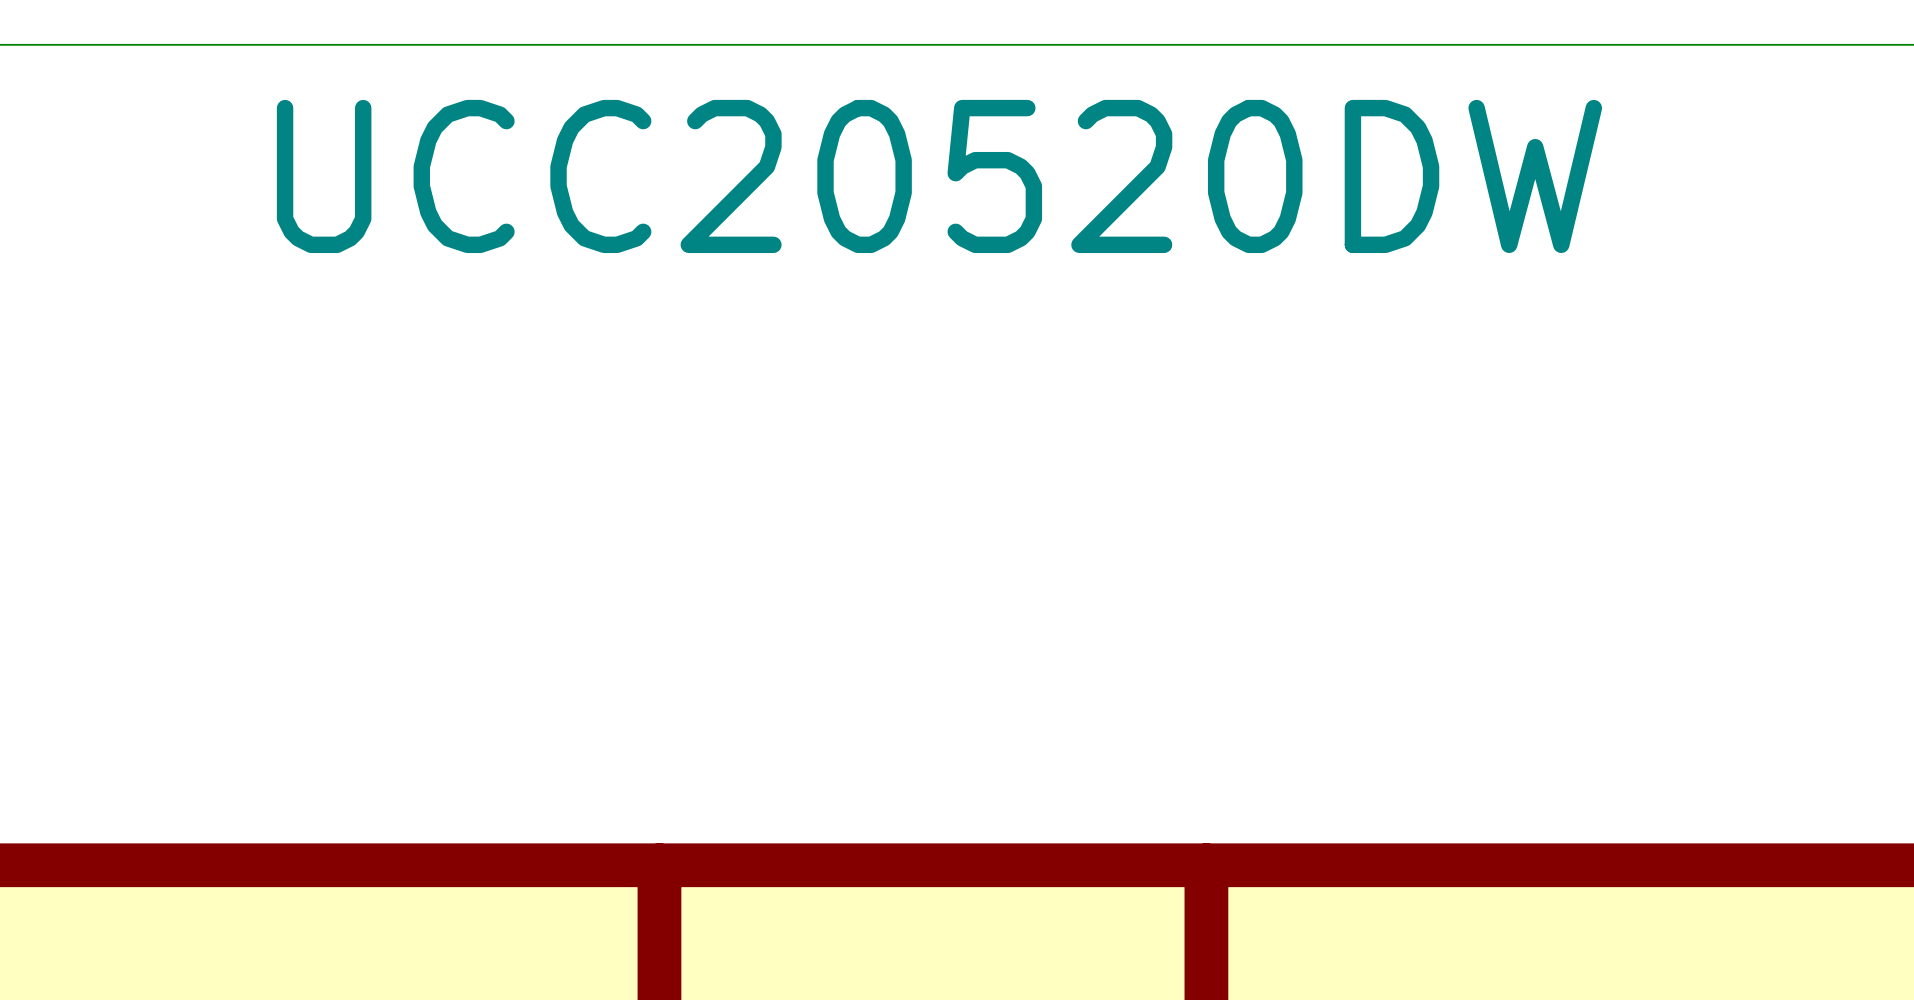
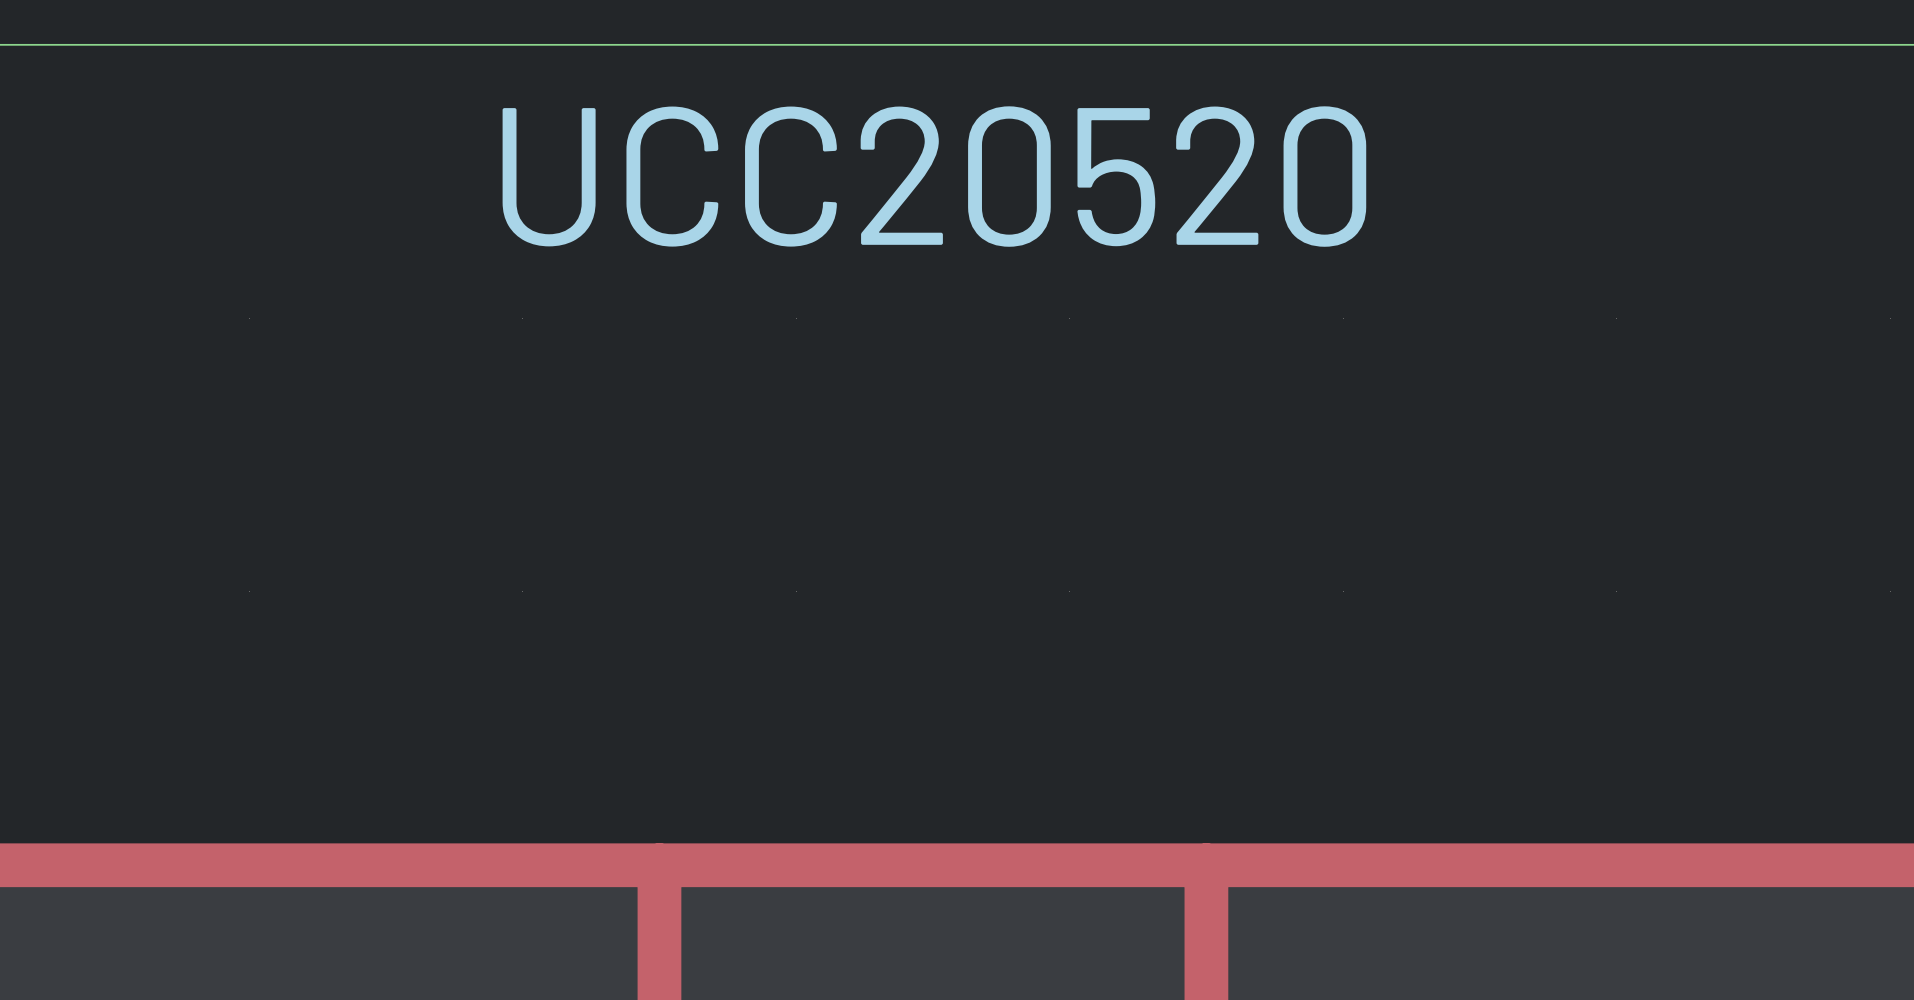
part value: UCC20520DW (939, 176) -> UCC20520 (934, 176)

